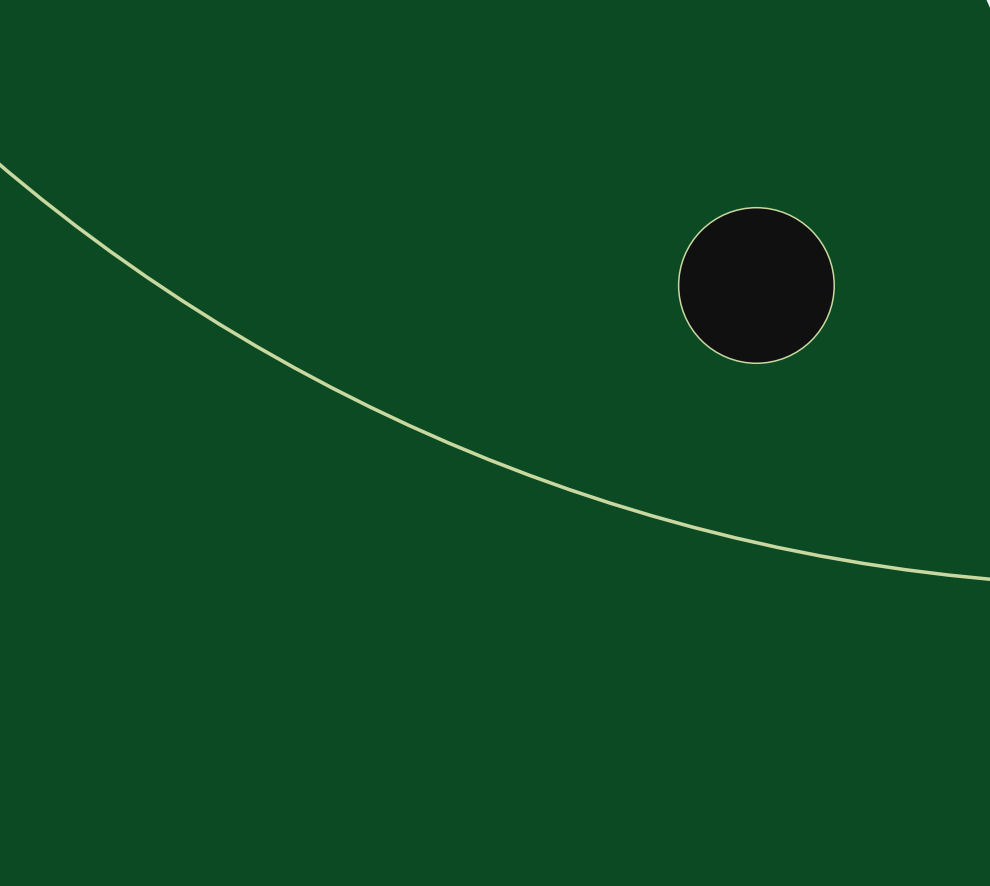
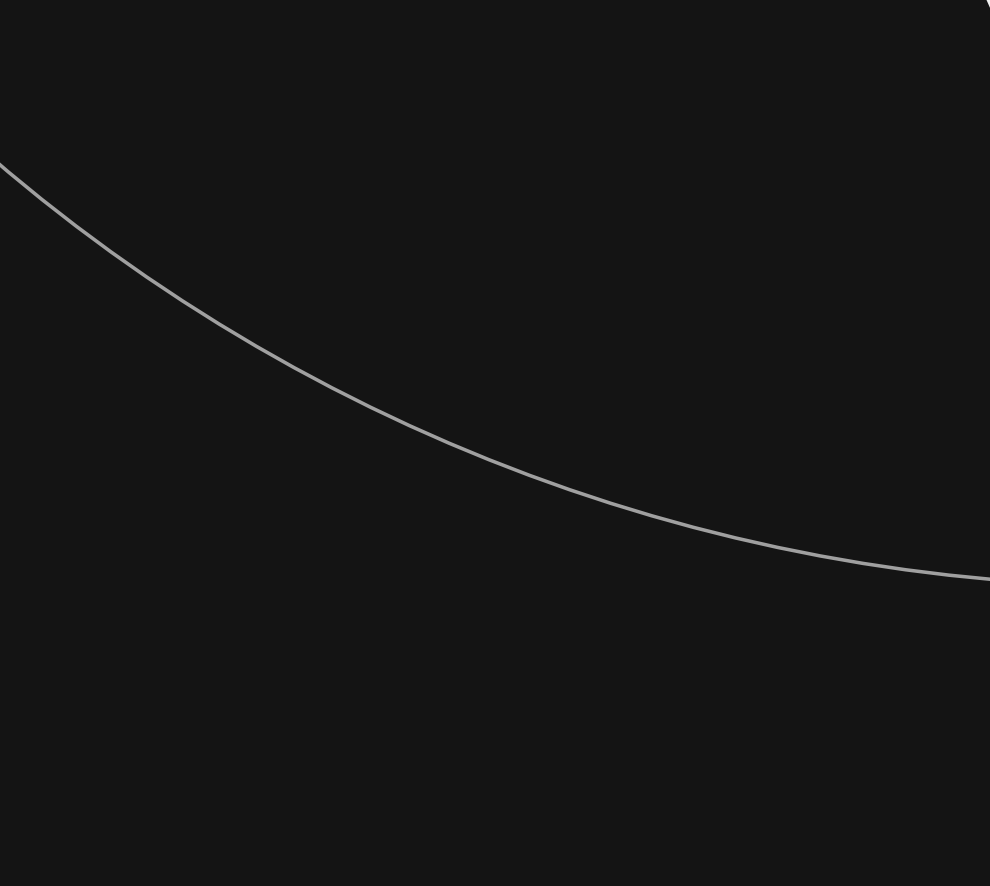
part: (756, 285) -> none

